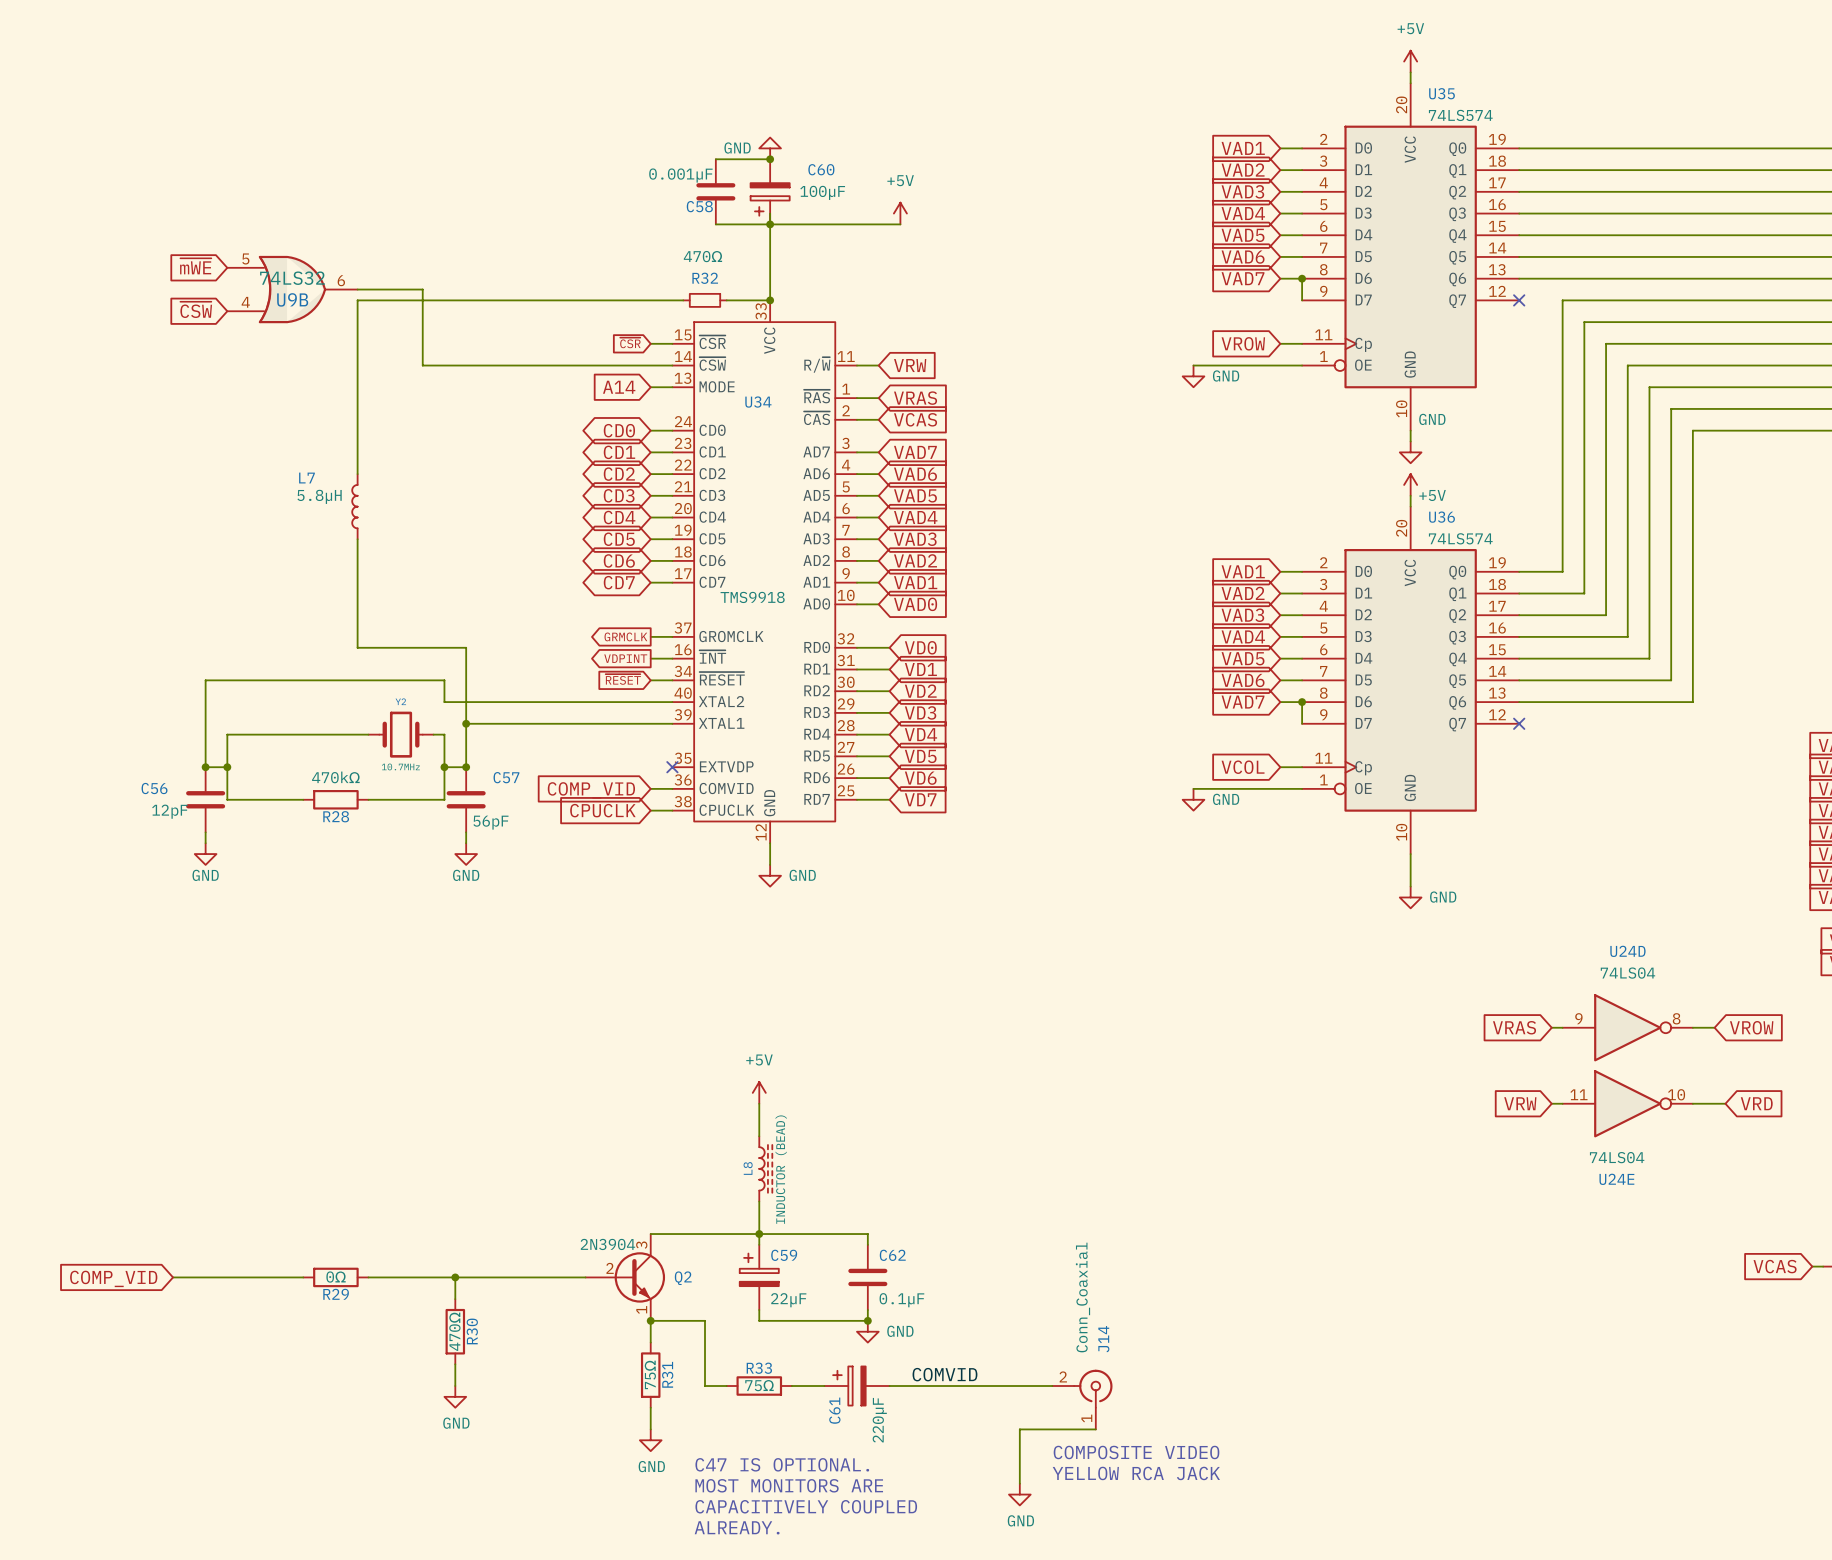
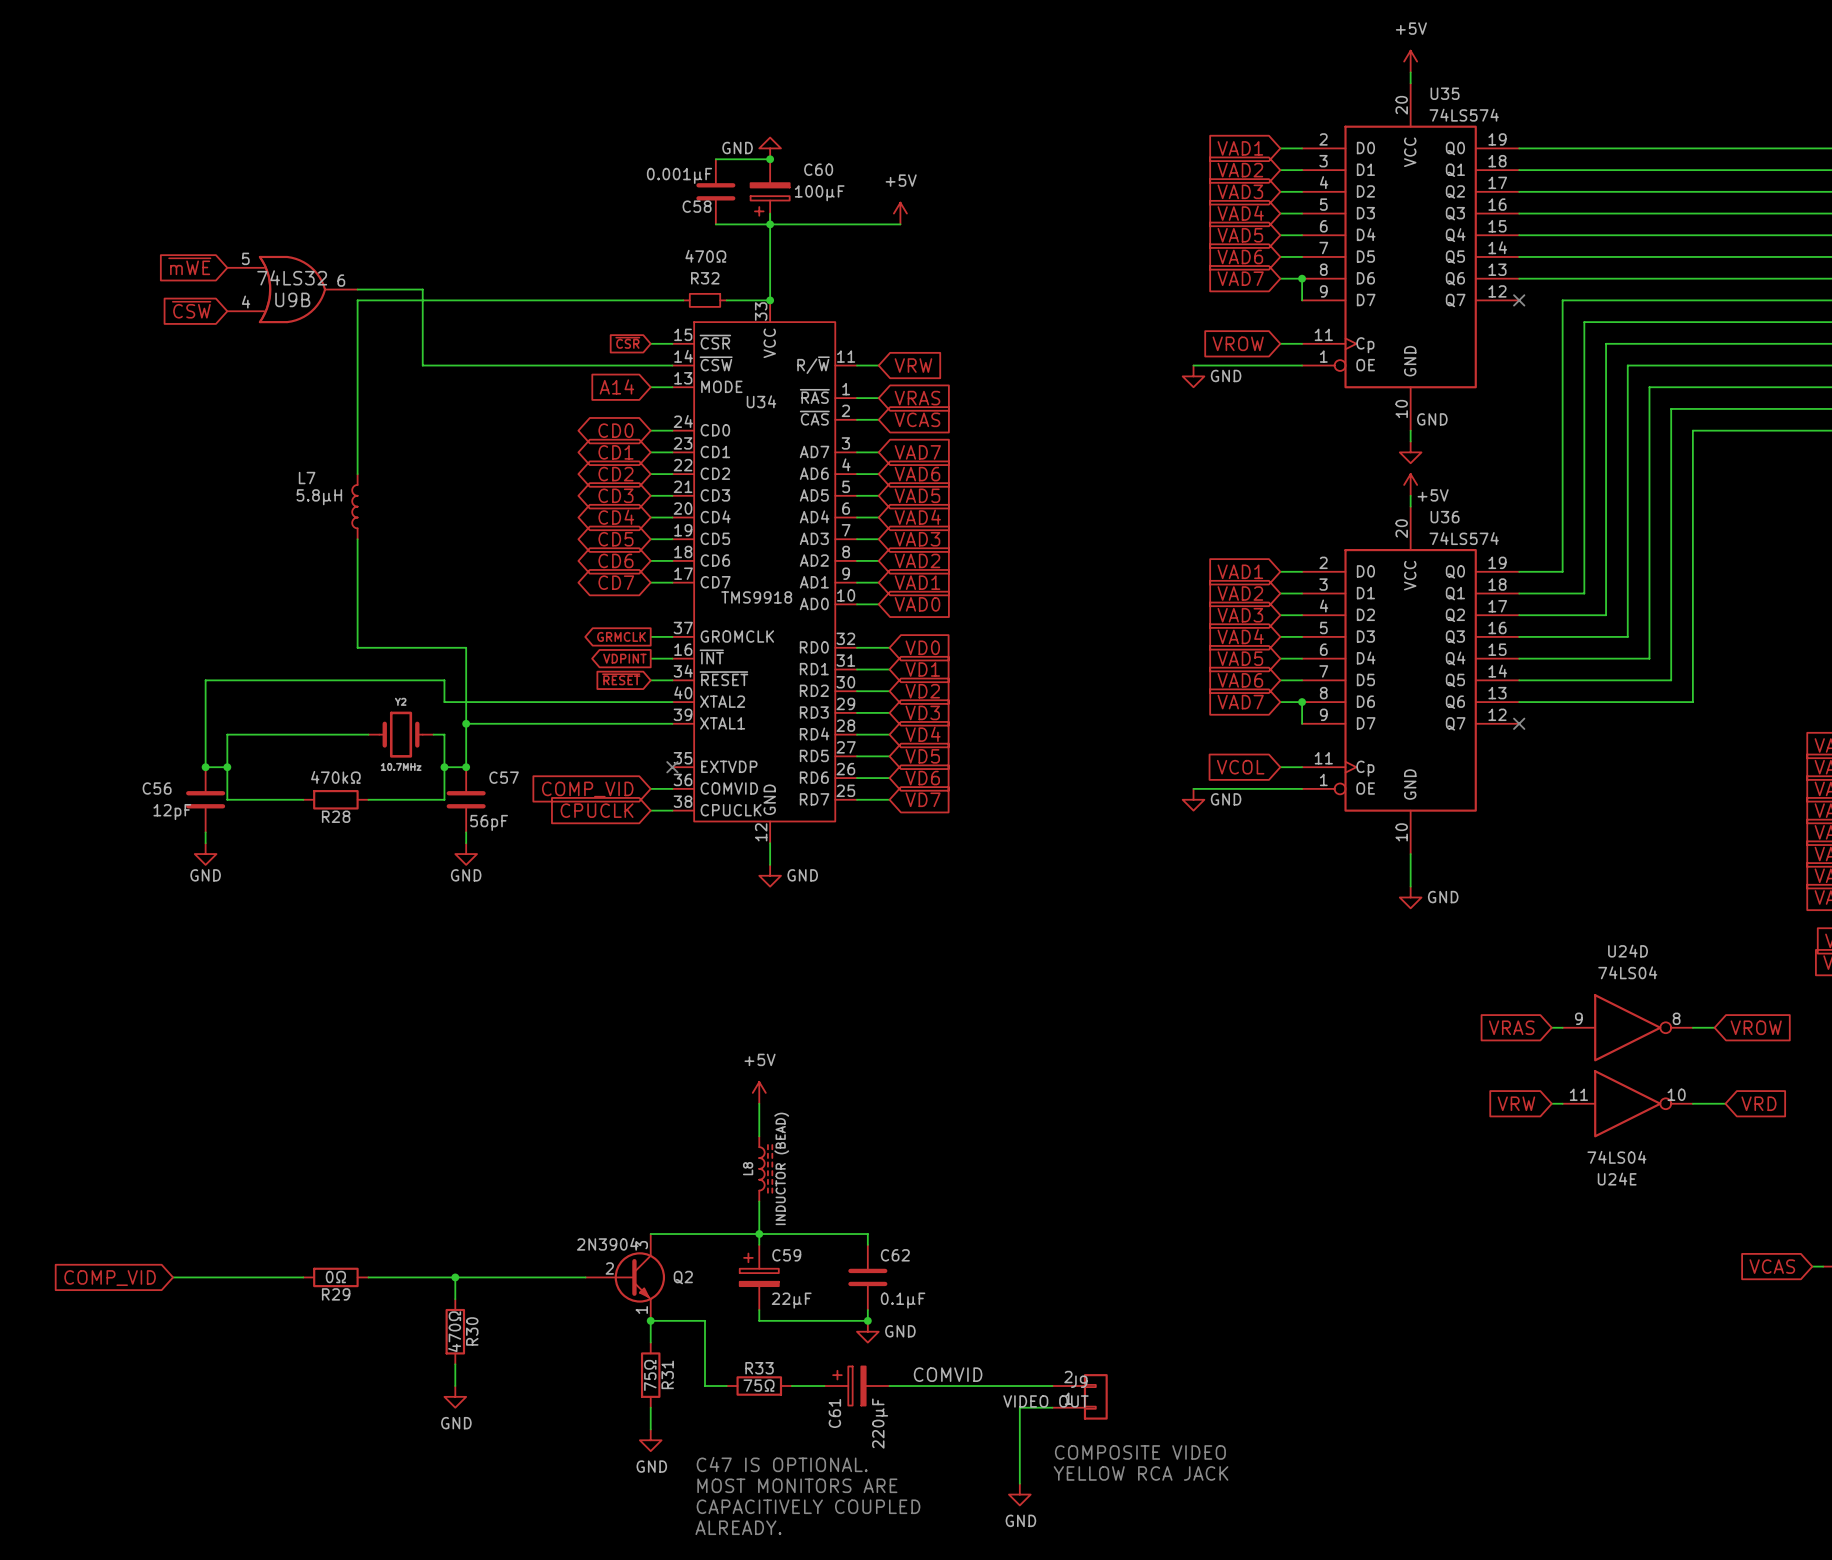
J9: none -> VIDEO OUT (1080, 1396)
J14: Conn_Coaxial (1082, 1399) -> none
wire: (1019, 1429) (1095, 1429) -> (1019, 1429) (1019, 1407) (1052, 1407)

